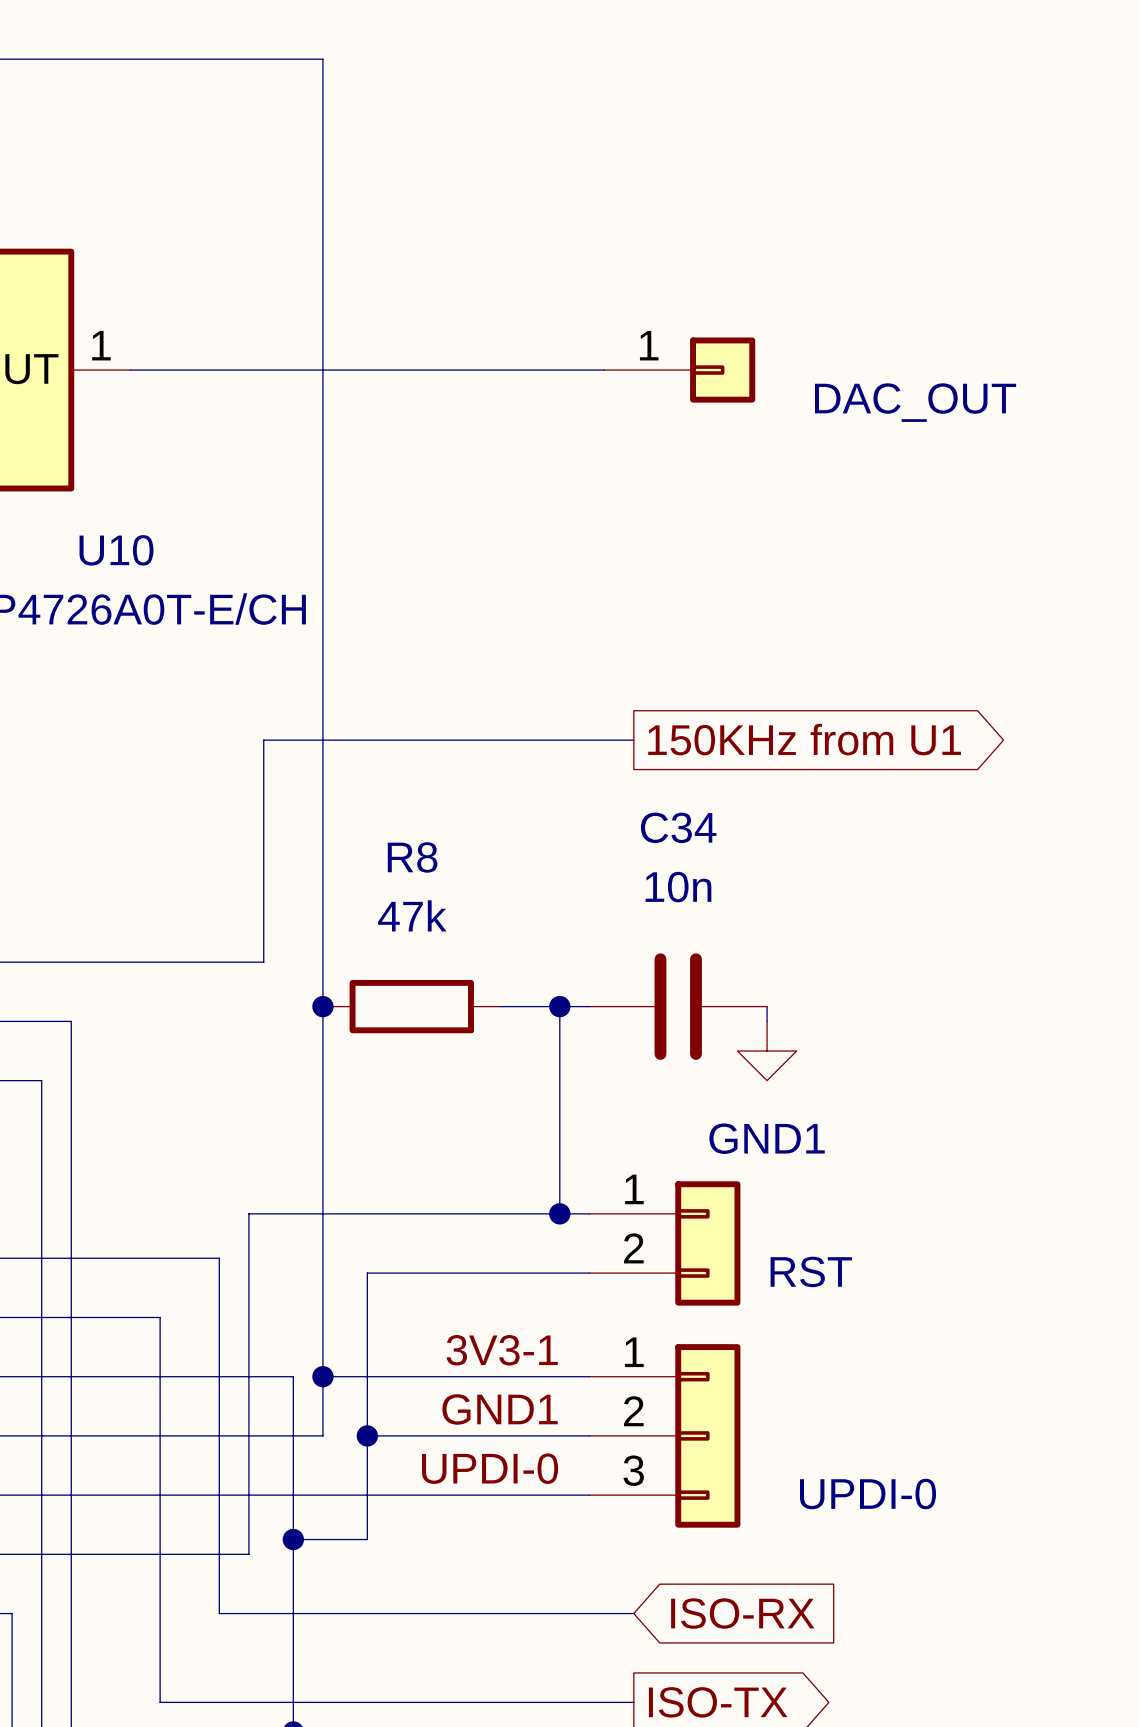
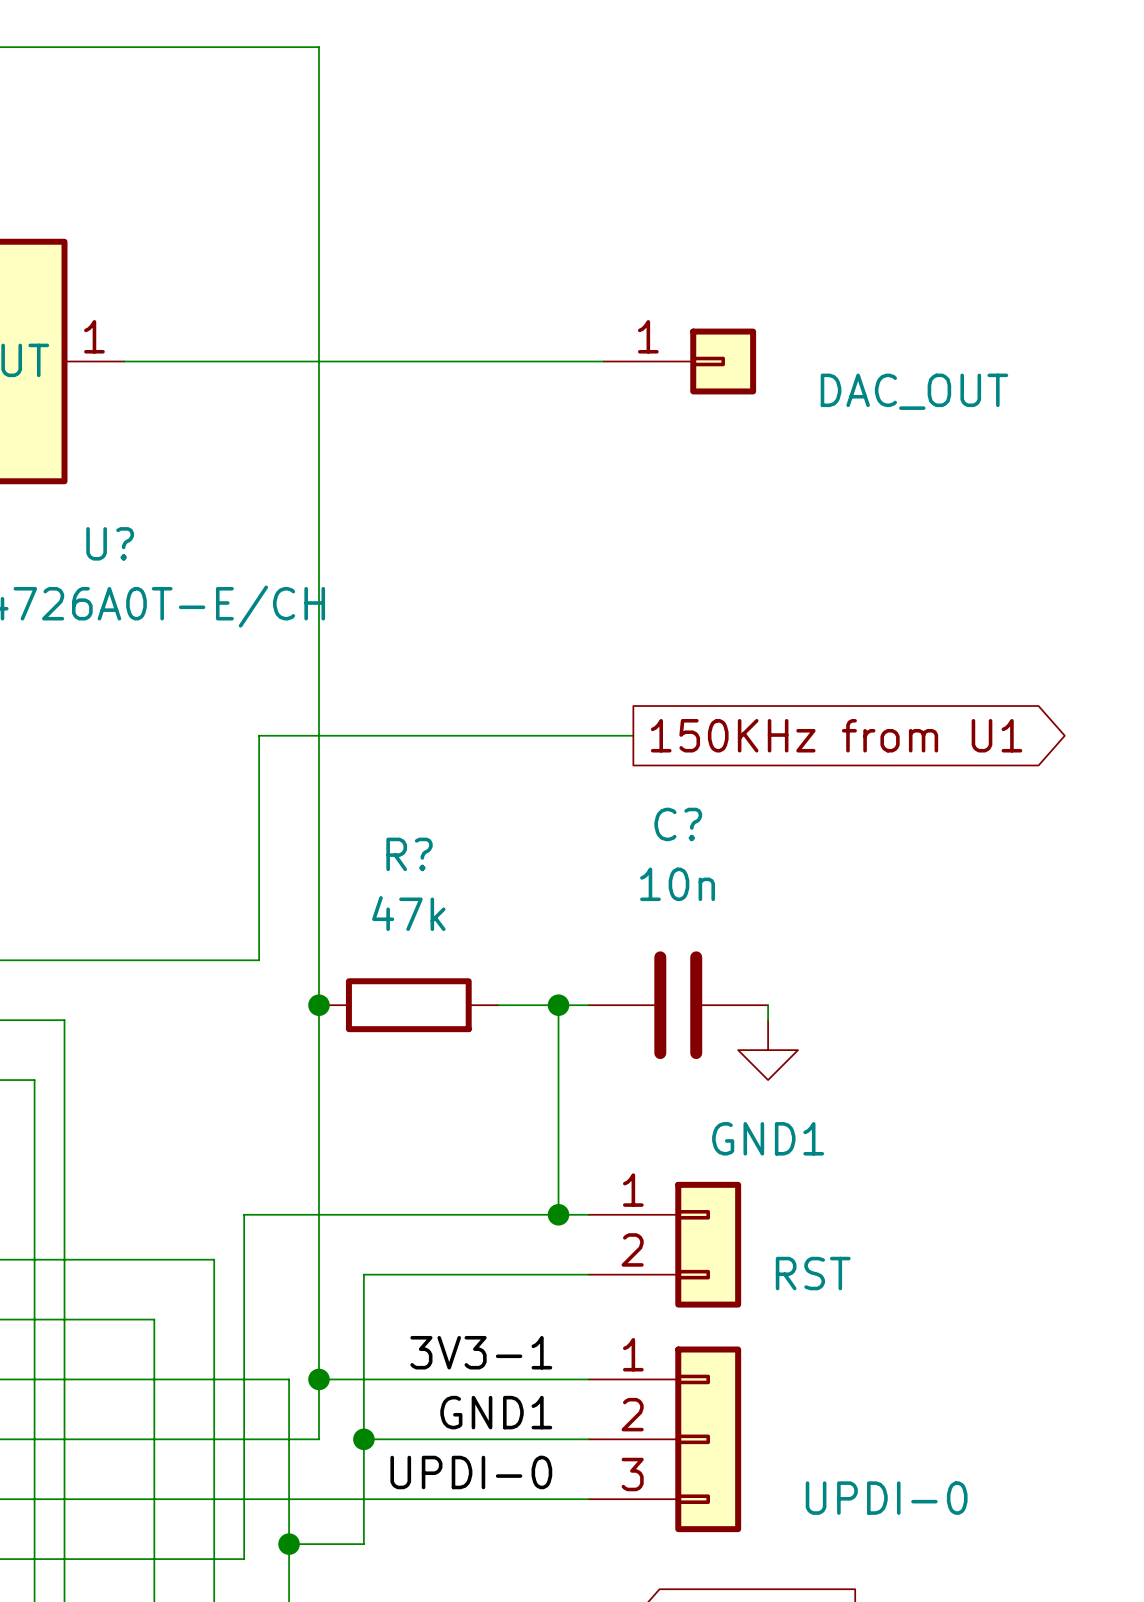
U10 name: U10 (116, 550) -> U? (110, 543)
C34 name: C34 (678, 827) -> C? (678, 824)
R8 name: R8 (412, 857) -> R? (409, 854)

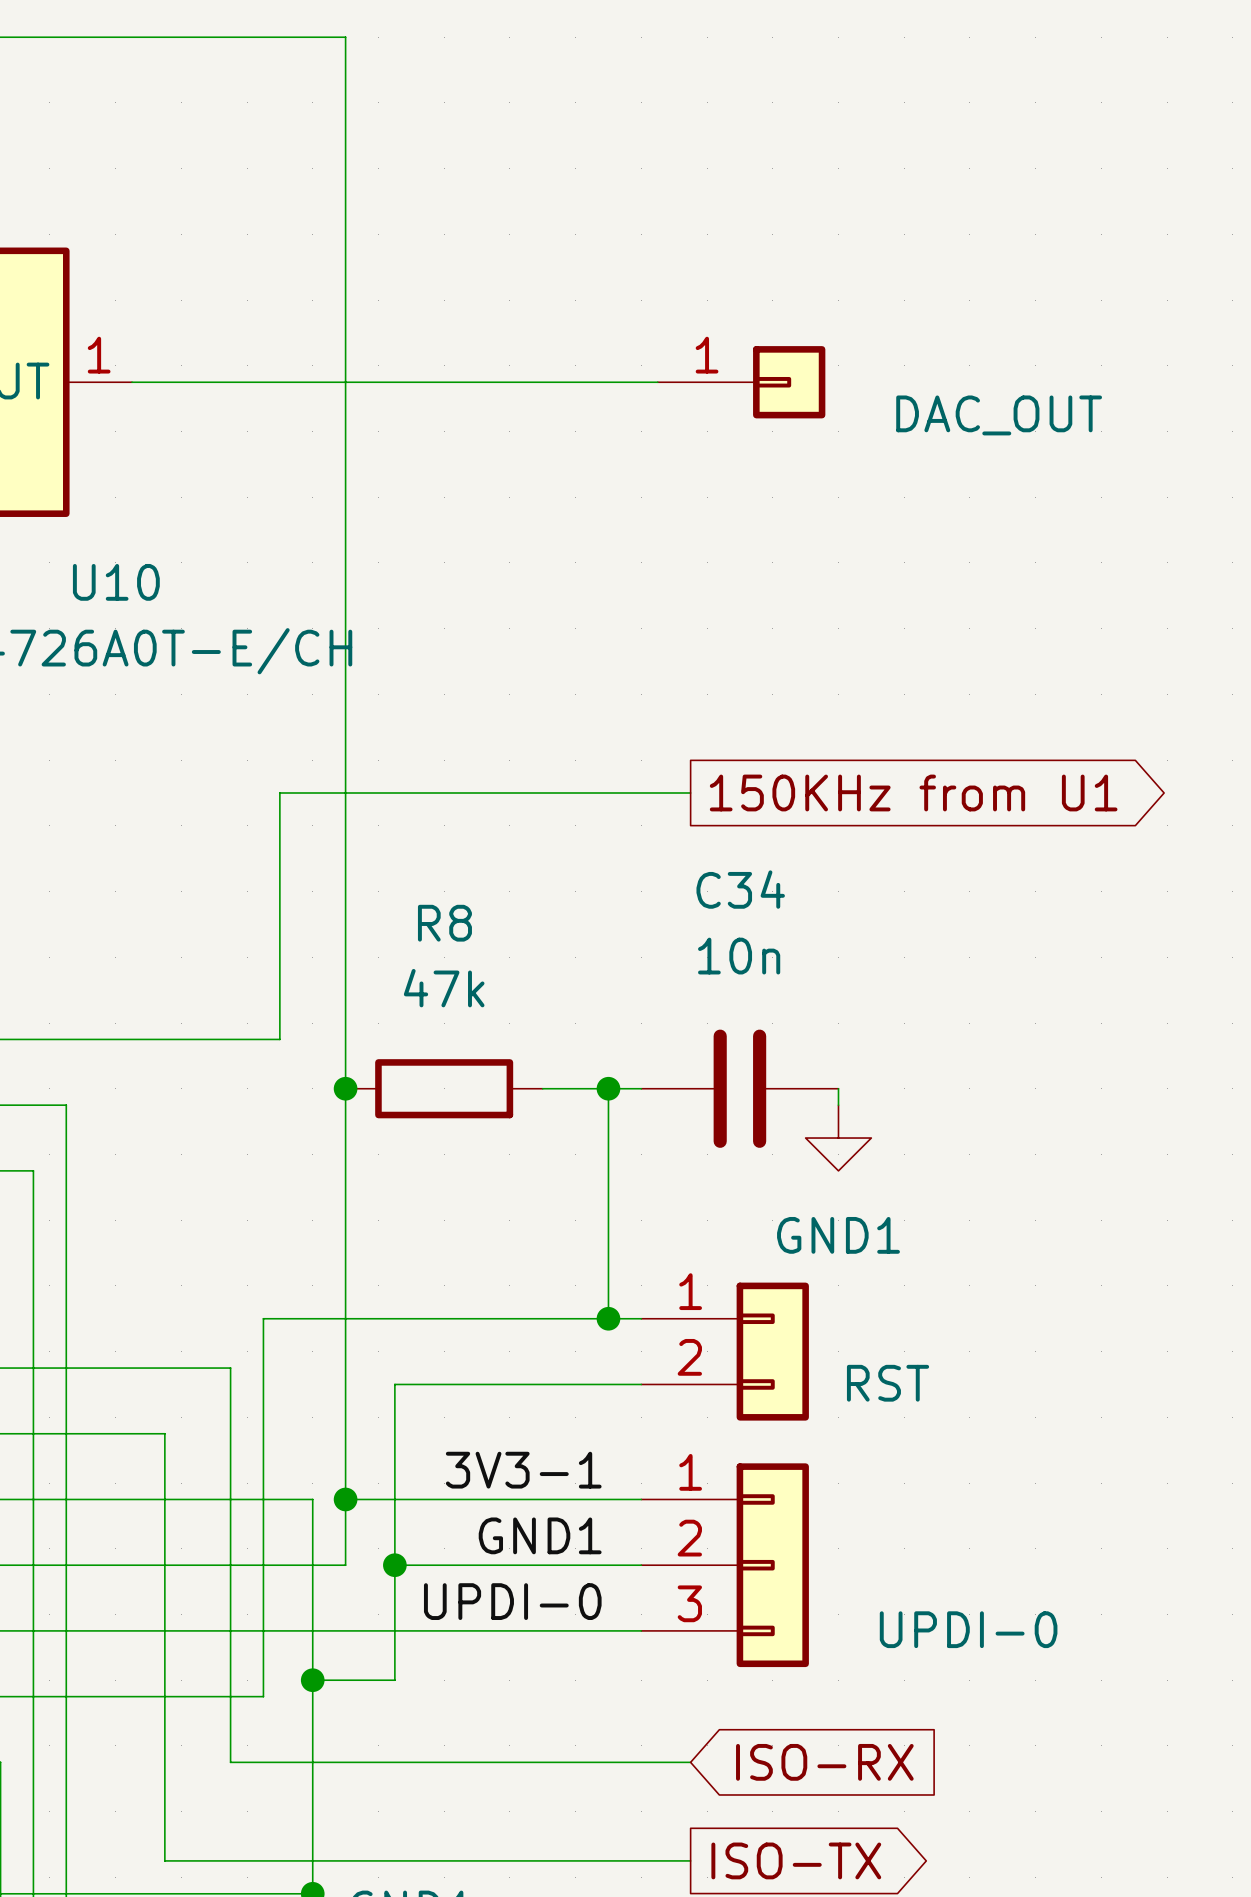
U? name: U? (110, 543) -> U10 (116, 582)
C? name: C? (678, 824) -> C34 (740, 889)
R? name: R? (409, 854) -> R8 (444, 923)

